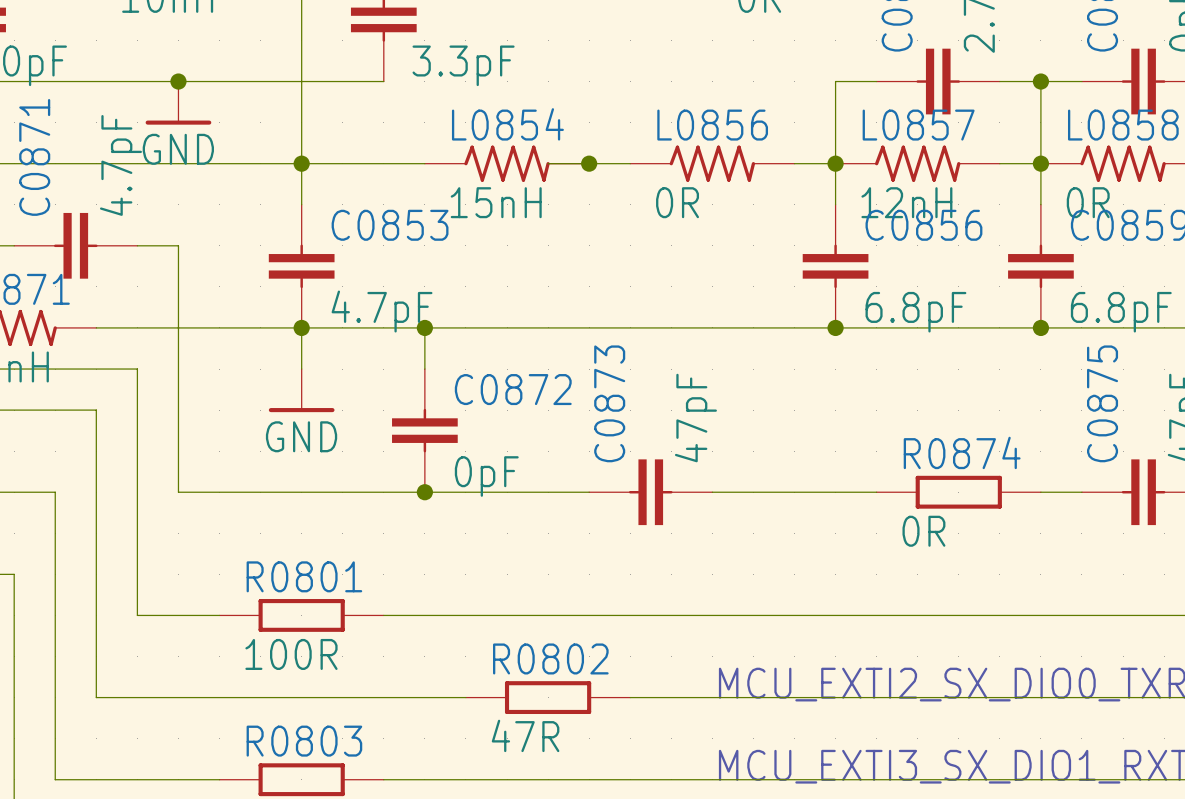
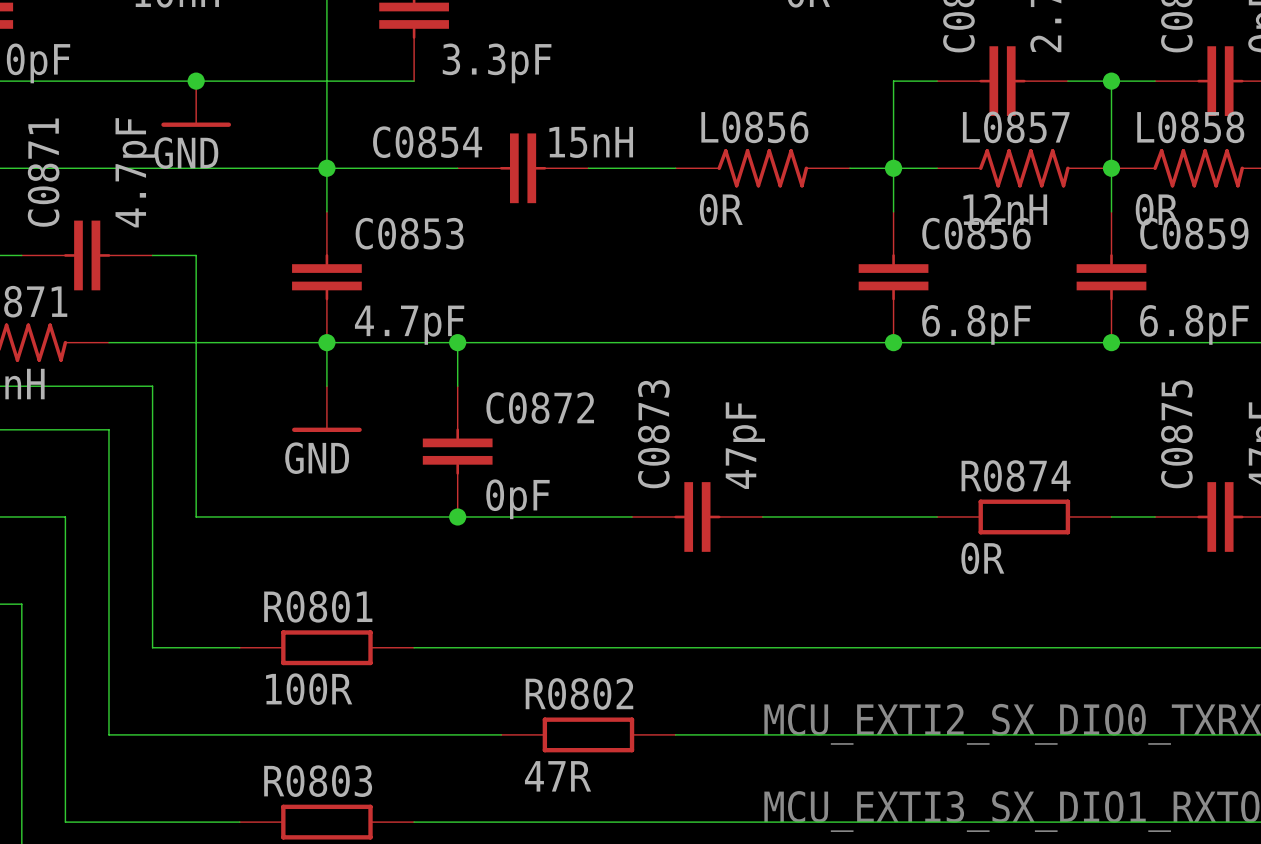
C0854: none -> 15nH (523, 168)
L0854: 15nH (507, 163) -> none
junction: (589, 163) -> none
L0857 position: (917, 163) -> (1024, 168)

